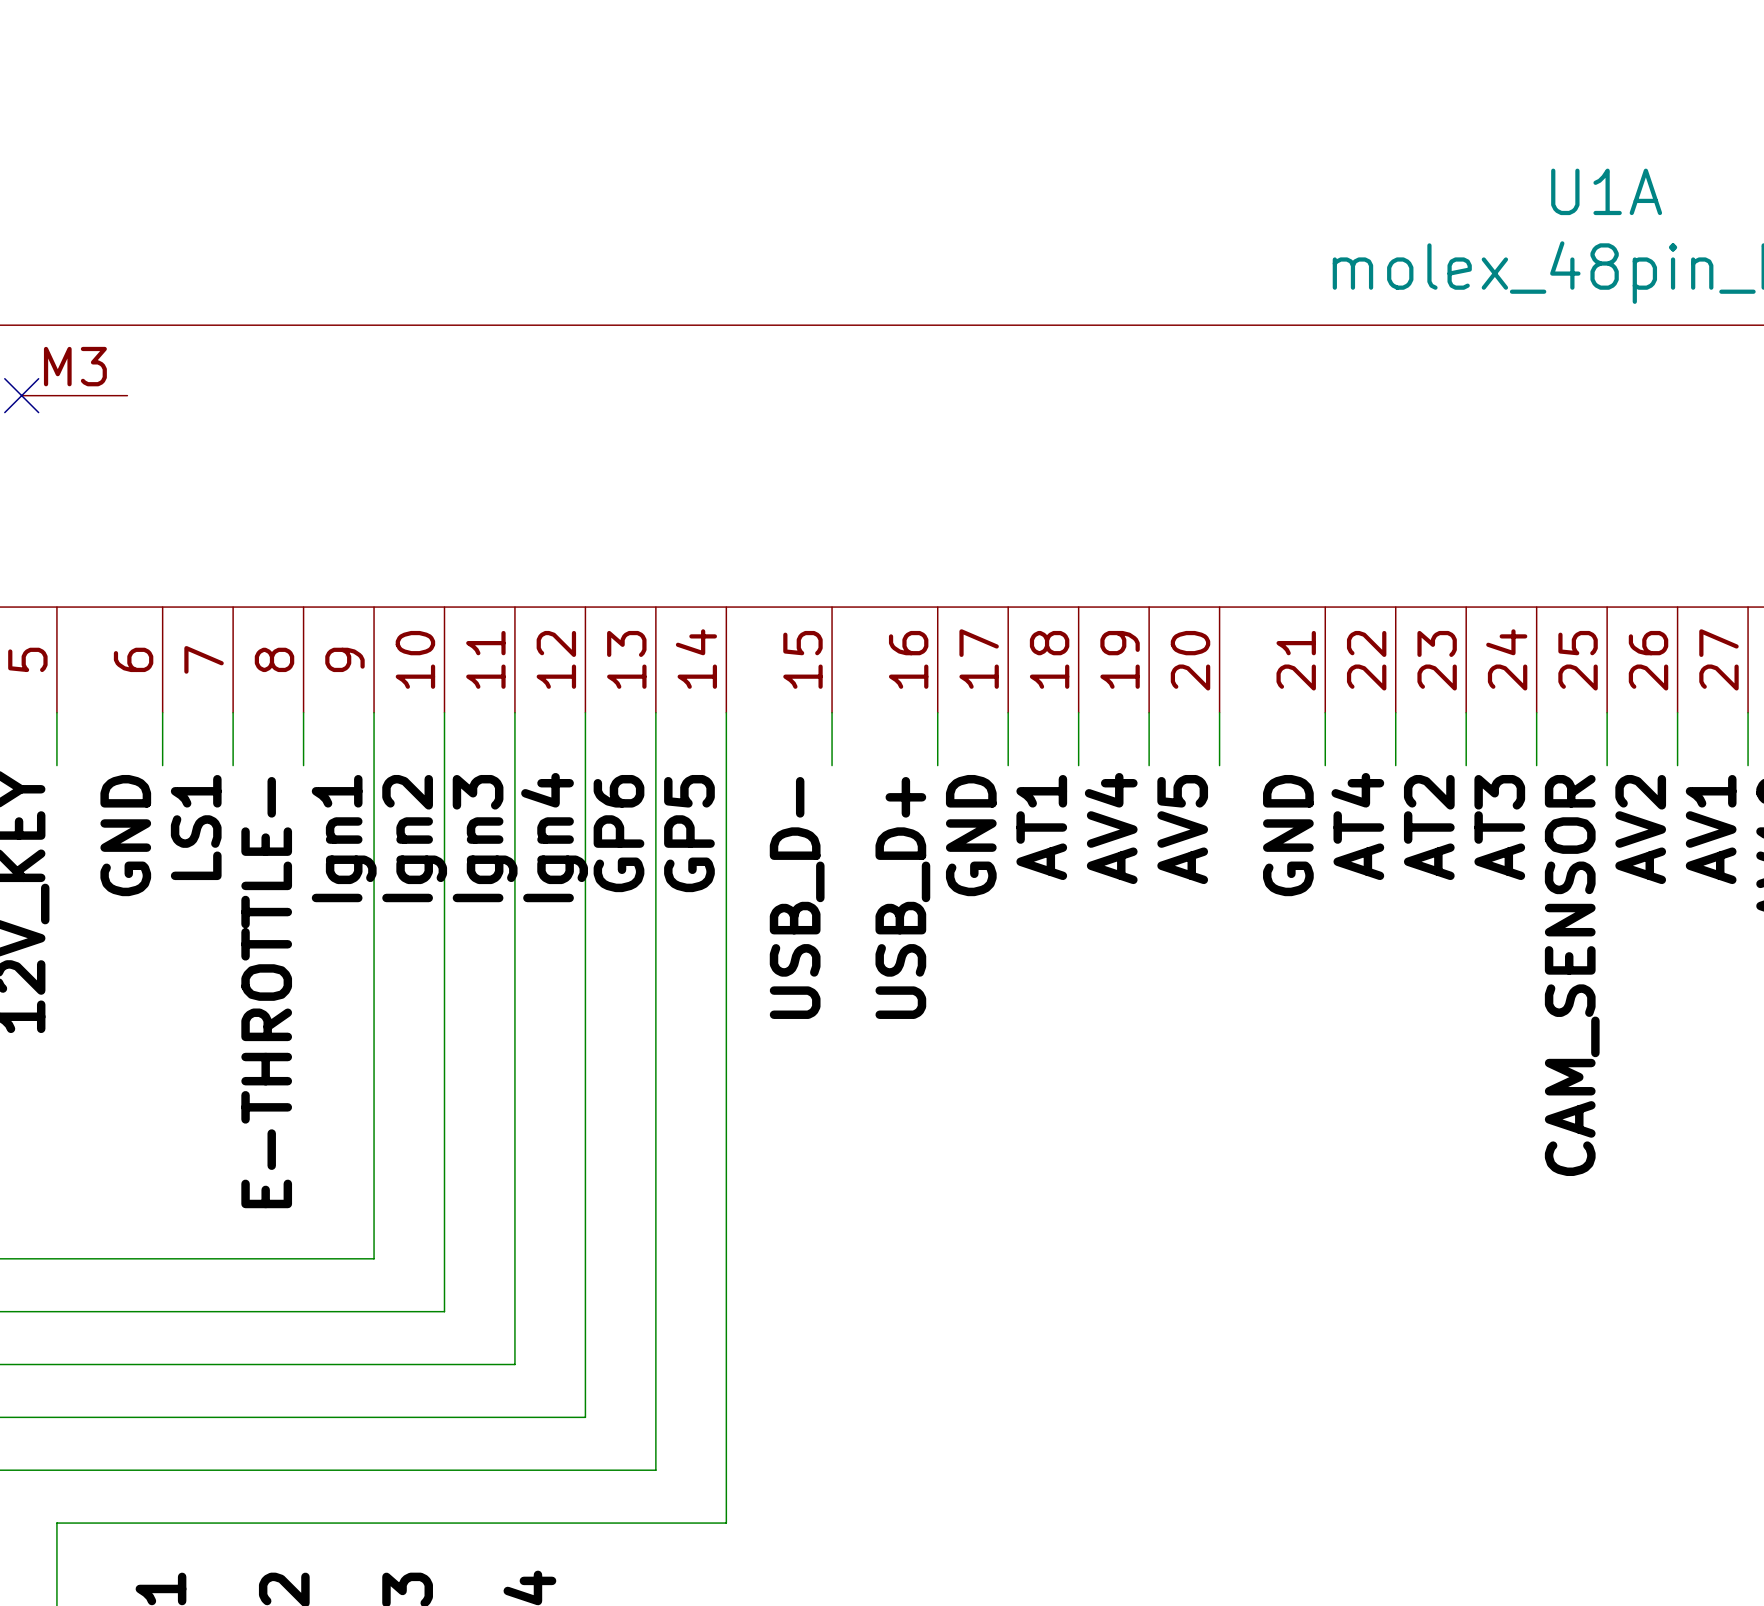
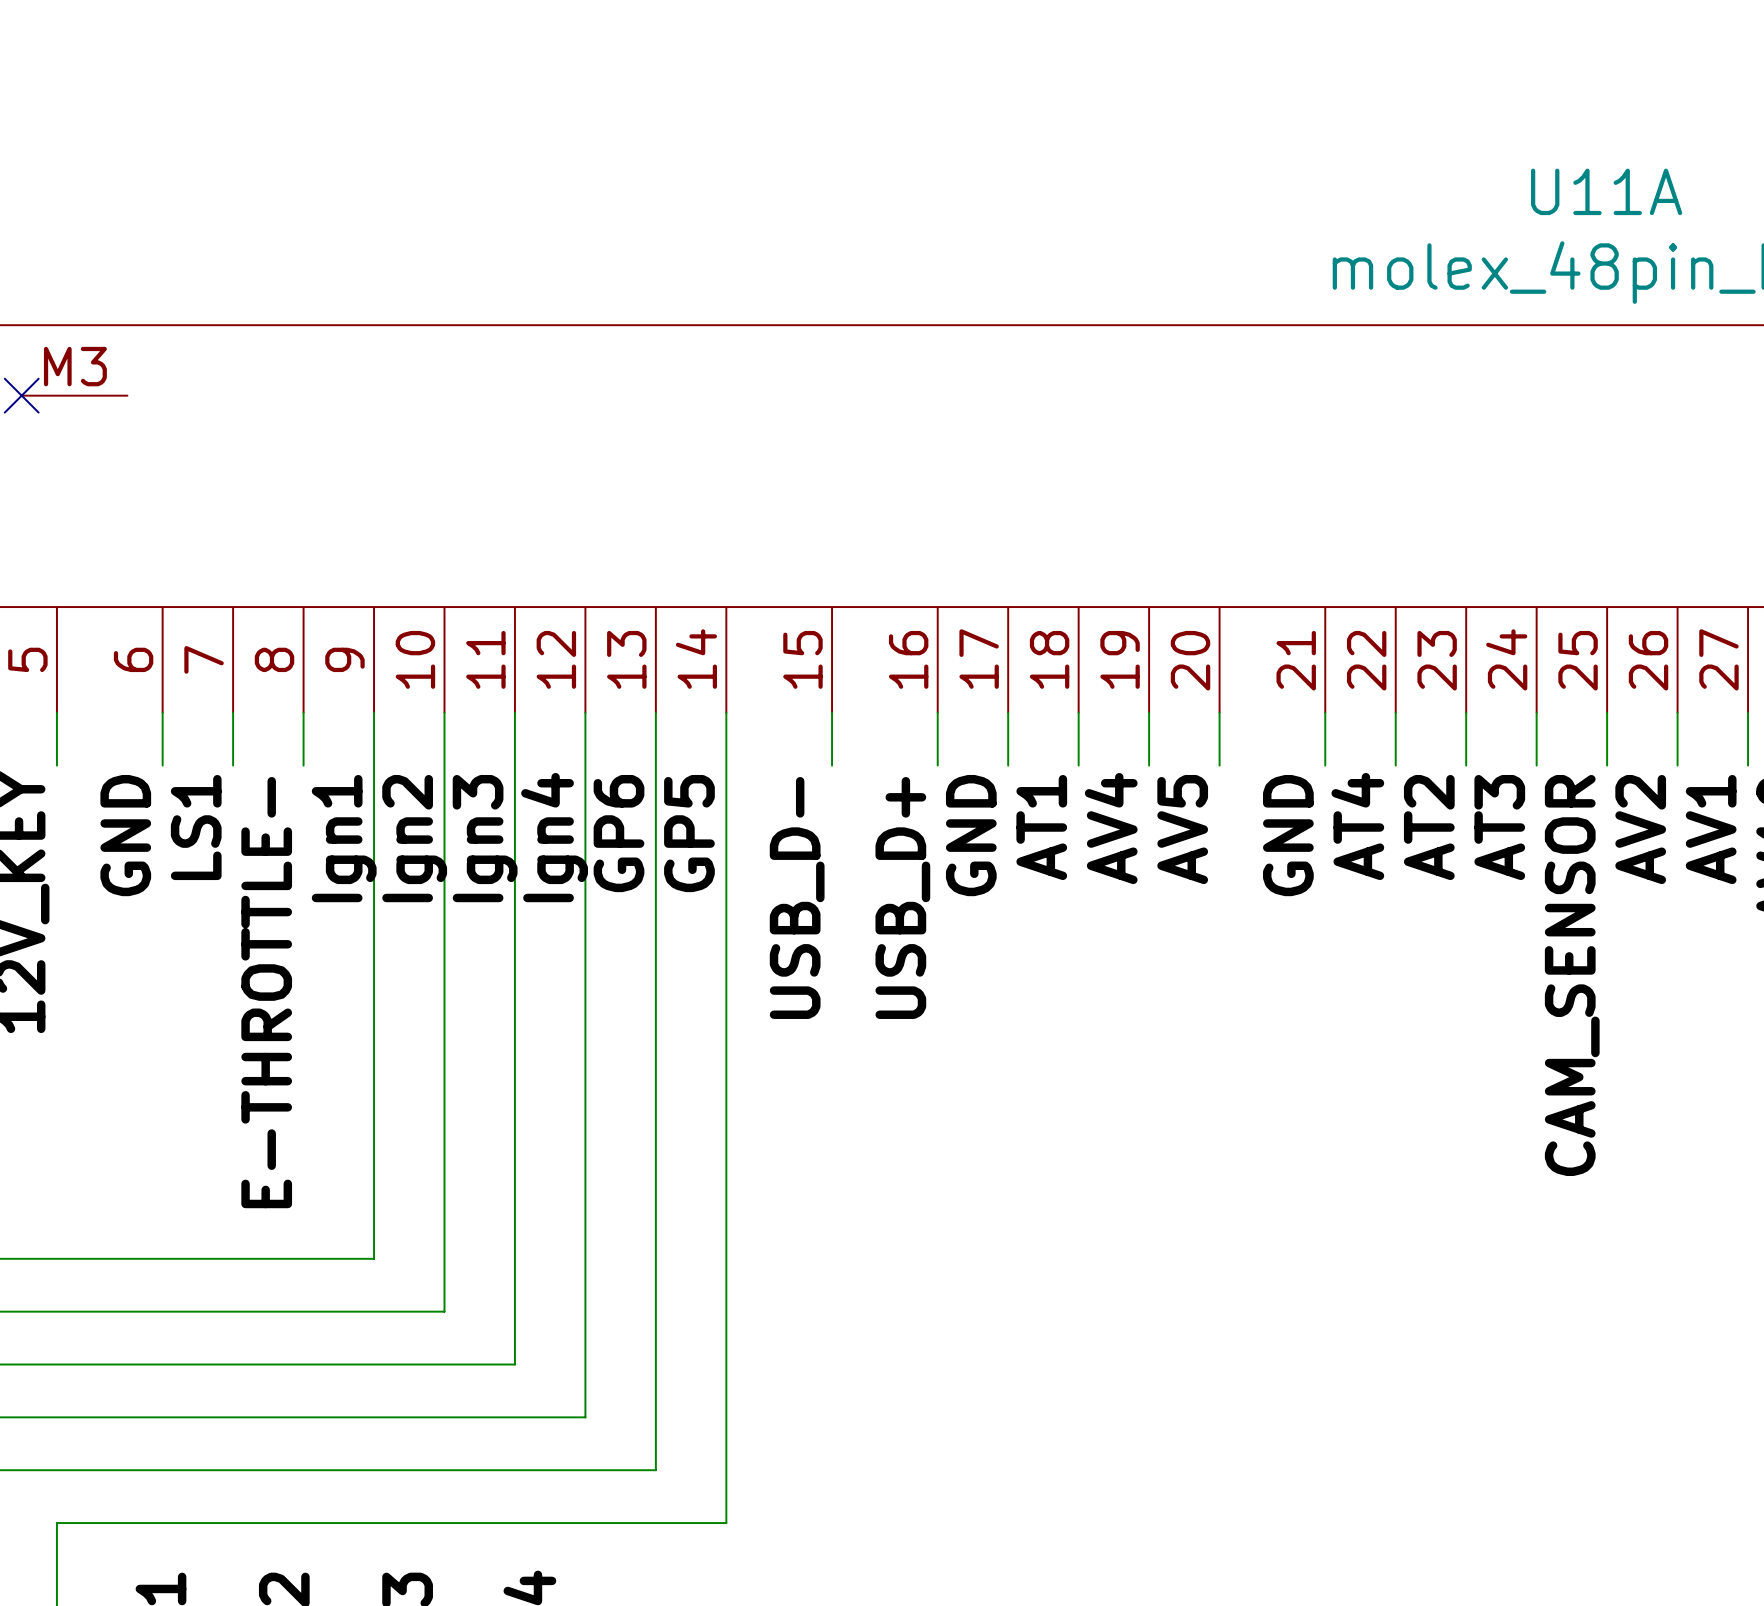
U1A name: U1A (1606, 191) -> U11A (1606, 191)

